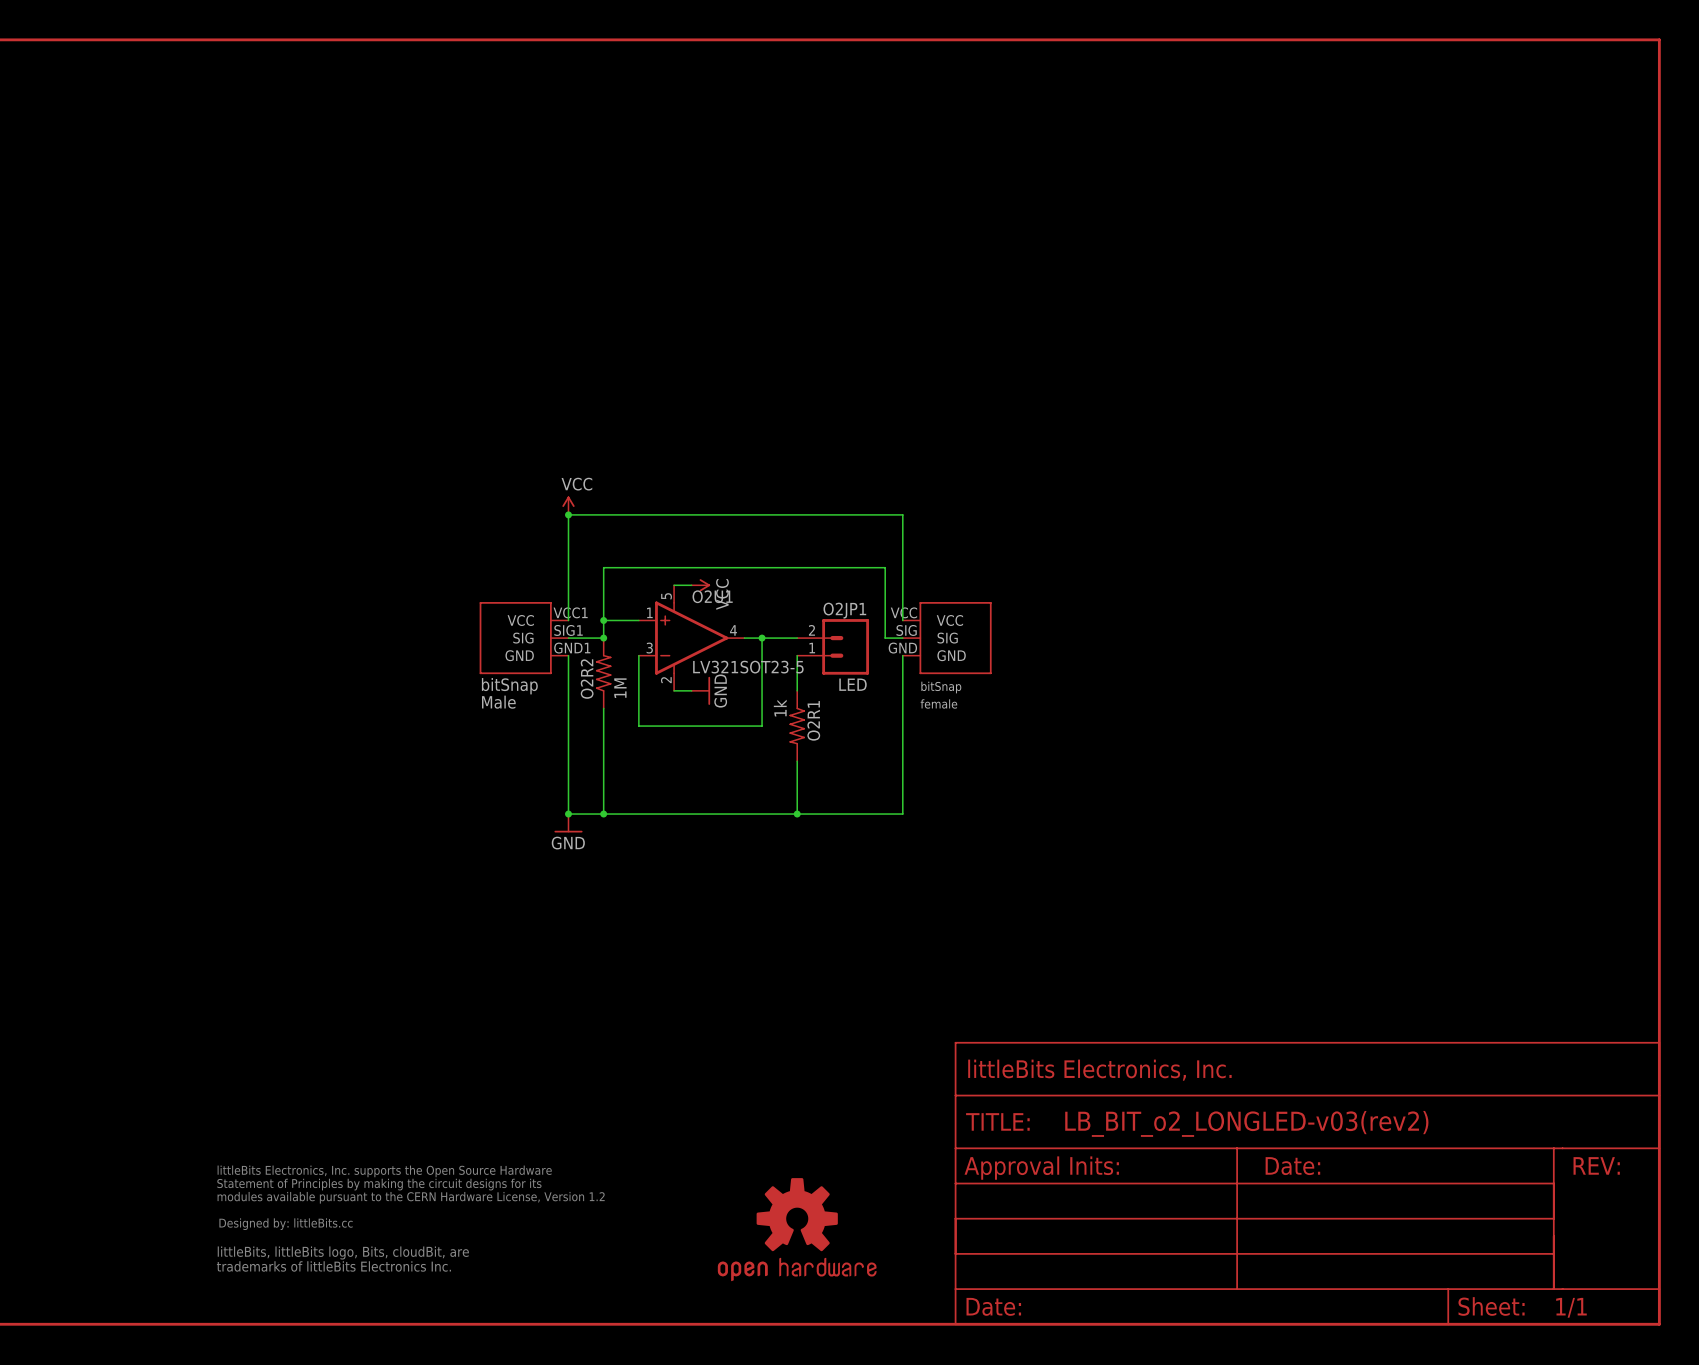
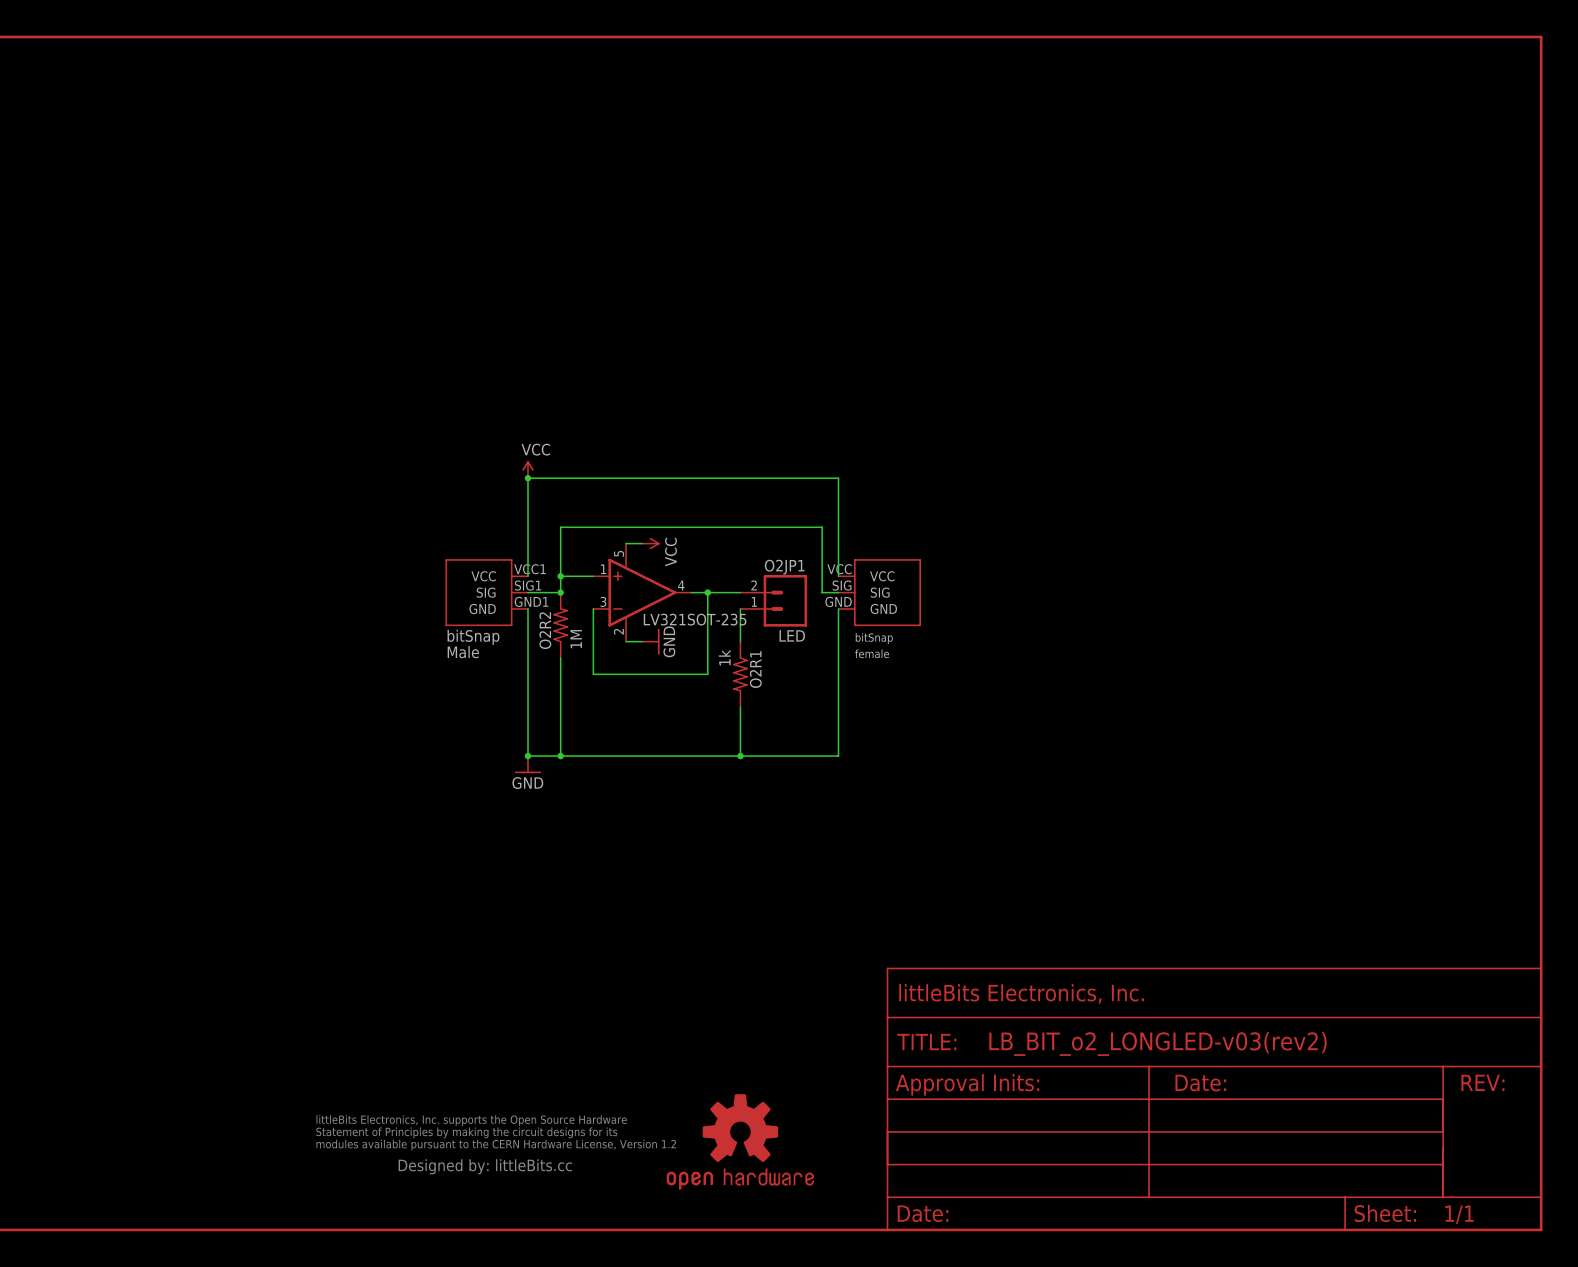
O2U1 name: O2U1 (712, 596) -> none
O2U1 value: LV321SOT23-5 (748, 667) -> LV321SOT-235 (695, 619)
part: (410, 1218) -> none
part: none -> (496, 1144)

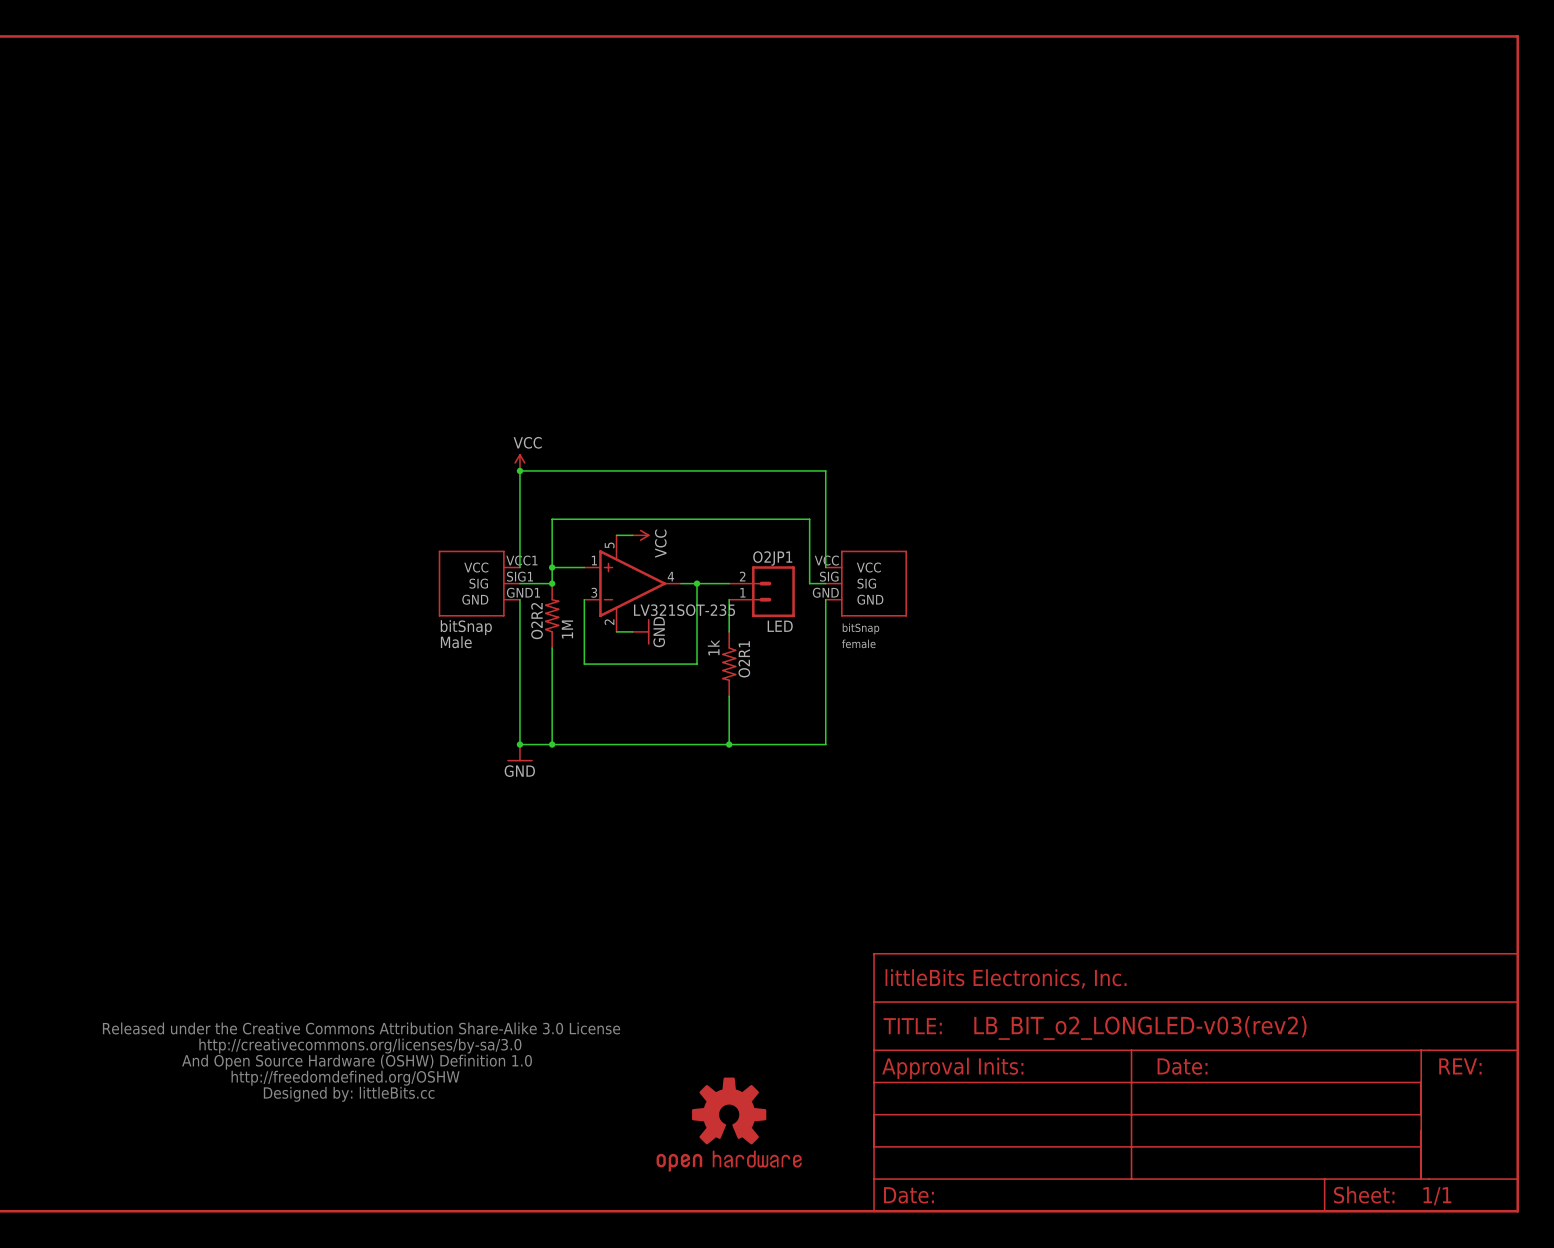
part: none -> (361, 1062)
part: (496, 1144) -> none

